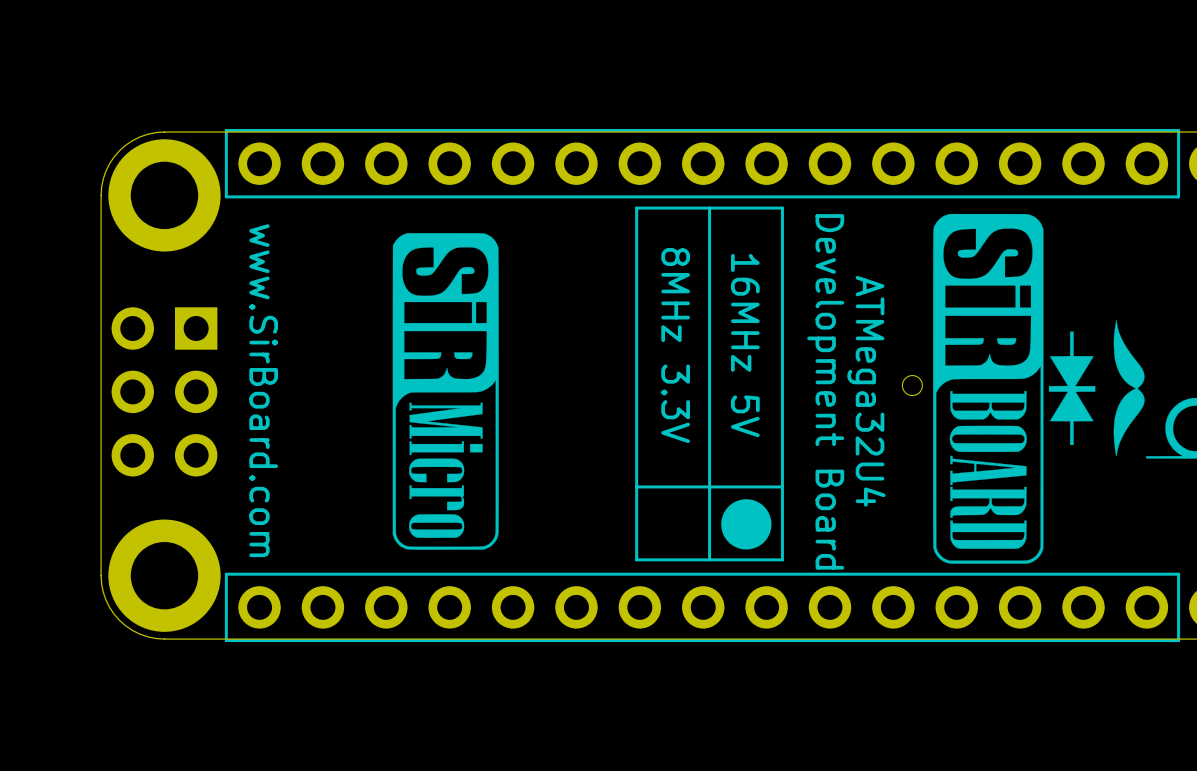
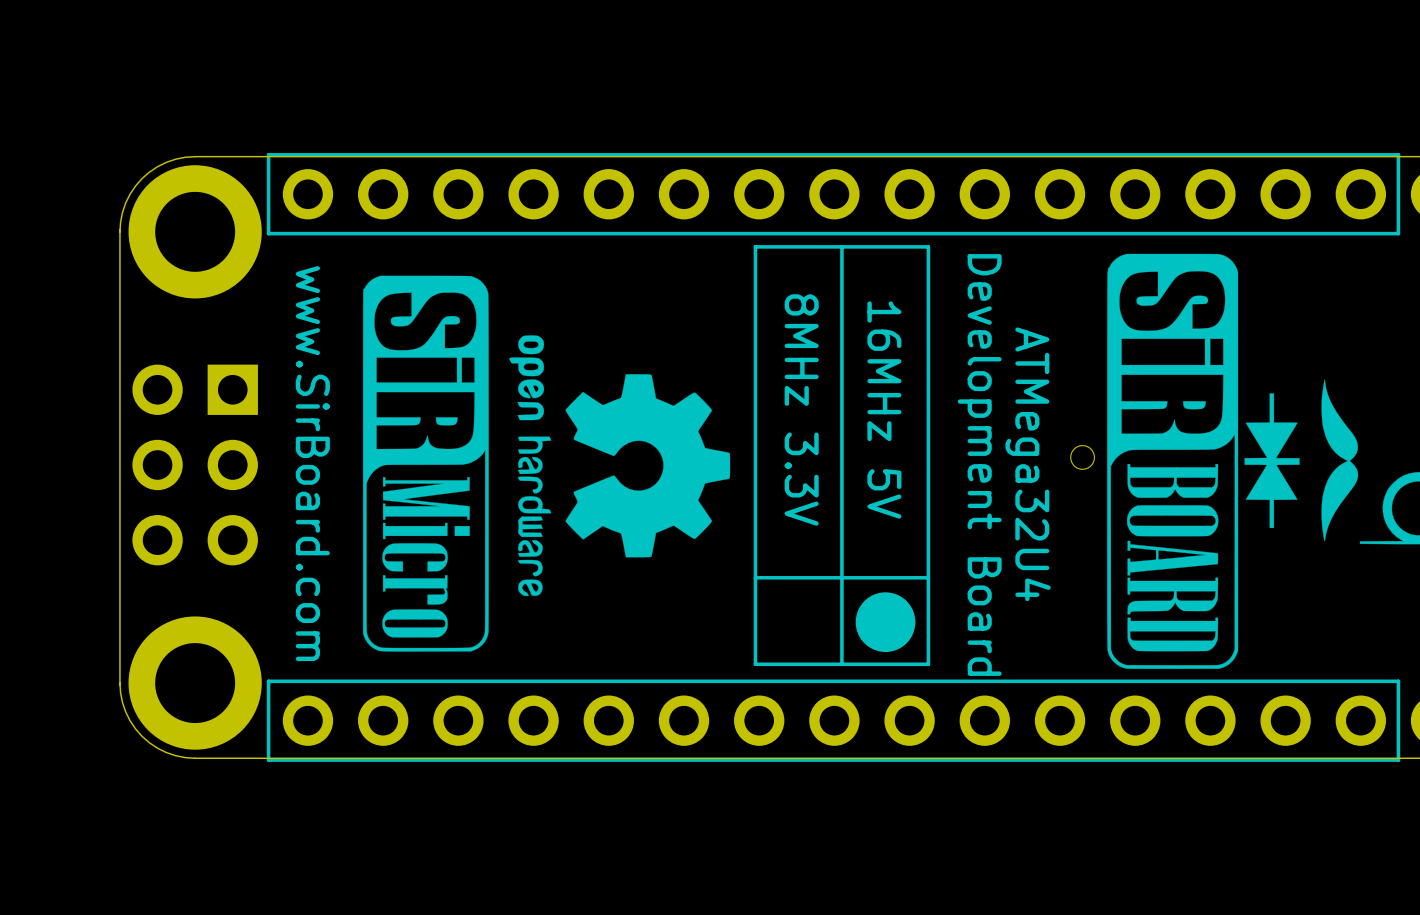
drawing: none -> [509, 335, 731, 597]
drawing position: (445, 391) -> (425, 463)

